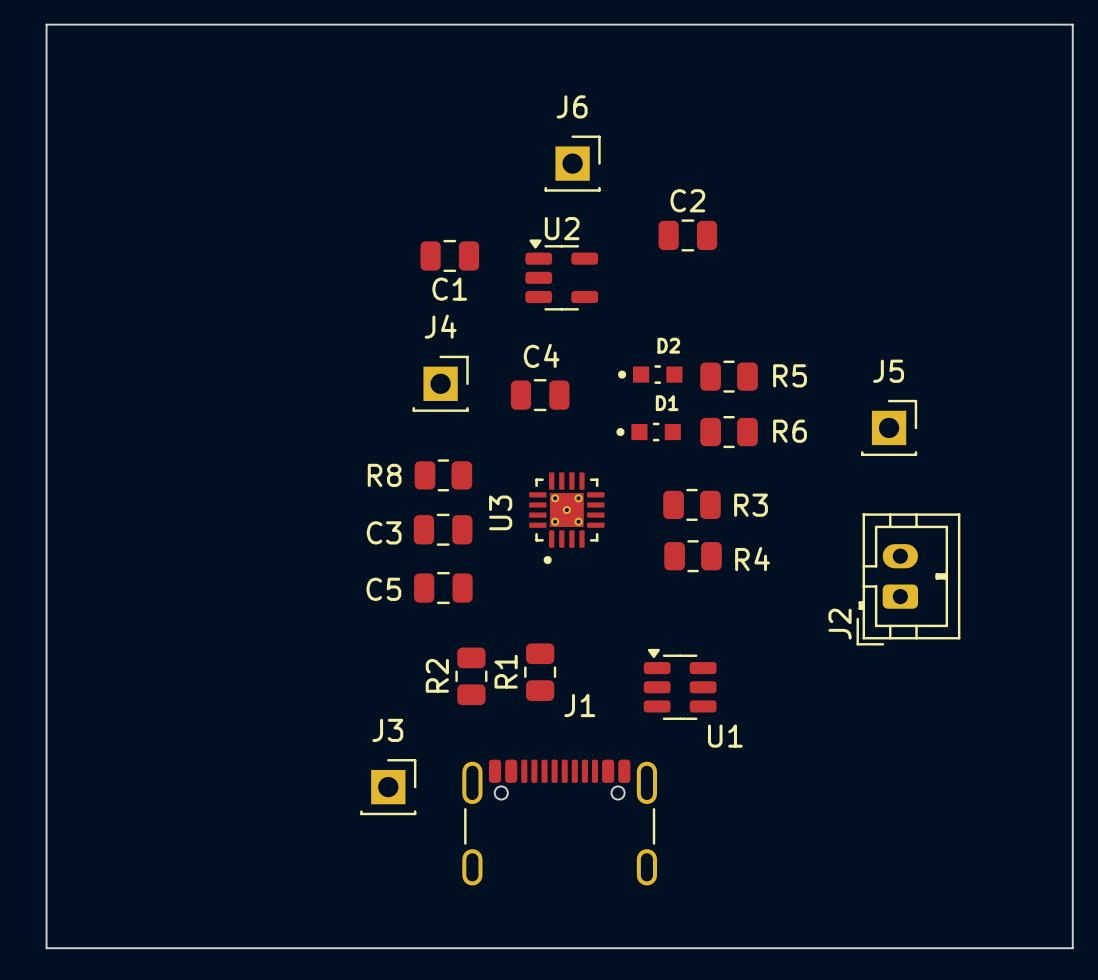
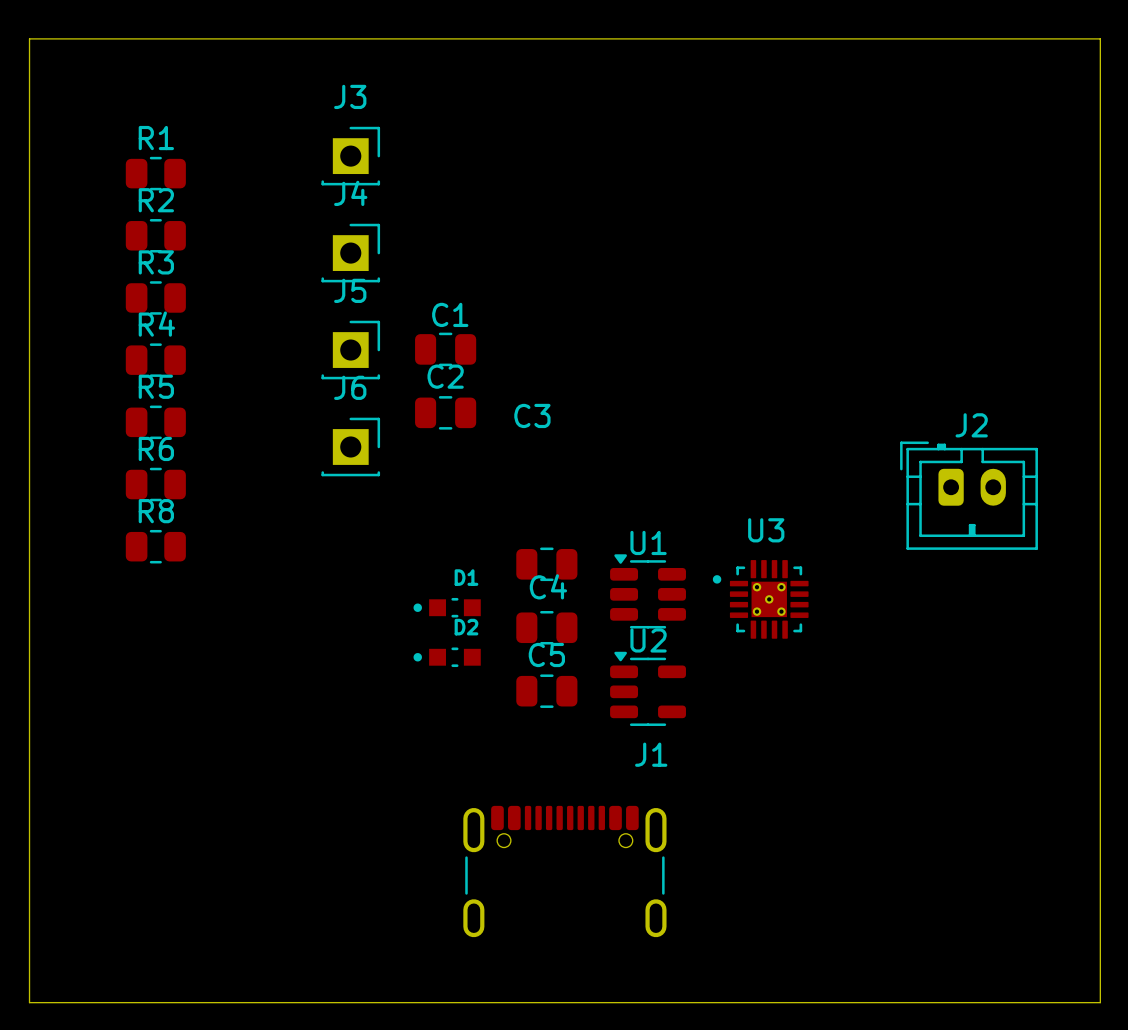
J6 position: (572, 163) -> (350, 447)
C2 position: (687, 235) -> (445, 412)
C1 position: (449, 255) -> (445, 349)
U2 position: (561, 274) -> (648, 688)
D2 position: (650, 374) -> (447, 657)
R5 name position: R5 (790, 375) -> R5 (156, 386)
R5 position: (729, 376) -> (155, 422)
J4 position: (440, 383) -> (350, 253)
C4 position: (540, 395) -> (546, 627)
J5 position: (889, 427) -> (350, 350)
R6 name position: R6 (790, 431) -> R6 (156, 448)
D1 position: (648, 432) -> (447, 607)
R6 position: (729, 432) -> (155, 484)
R8 name position: R8 (384, 475) -> R8 (156, 511)
R8 position: (443, 475) -> (155, 546)
R3 position: (692, 504) -> (155, 297)
R3 name position: R3 (751, 505) -> R3 (156, 262)
U3 rotation: 0° (566, 518) -> 90° clockwise (760, 599)
U3 position: (566, 518) -> (760, 599)
C3 position: (443, 529) -> (546, 564)
C3 name position: C3 (384, 532) -> C3 (532, 415)
R4 position: (693, 556) -> (155, 360)
R4 name position: R4 (752, 559) -> R4 (156, 324)
J2 rotation: 0° (908, 579) -> 90° clockwise (969, 495)
J2 position: (908, 579) -> (969, 495)
C5 position: (443, 588) -> (546, 691)
C5 name position: C5 (383, 589) -> C5 (546, 655)
J2 name position: J2 (840, 624) -> J2 (971, 425)
R1 rotation: 0° (540, 672) -> 90° clockwise (155, 173)
R1 position: (540, 672) -> (155, 173)
R2 rotation: 0° (471, 676) -> 90° clockwise (155, 235)
R2 position: (471, 676) -> (155, 235)
U1 position: (680, 684) -> (648, 591)
J1 name position: J1 (579, 705) -> J1 (651, 754)
U1 name position: U1 (725, 736) -> U1 (648, 542)
J3 position: (388, 787) -> (350, 156)

